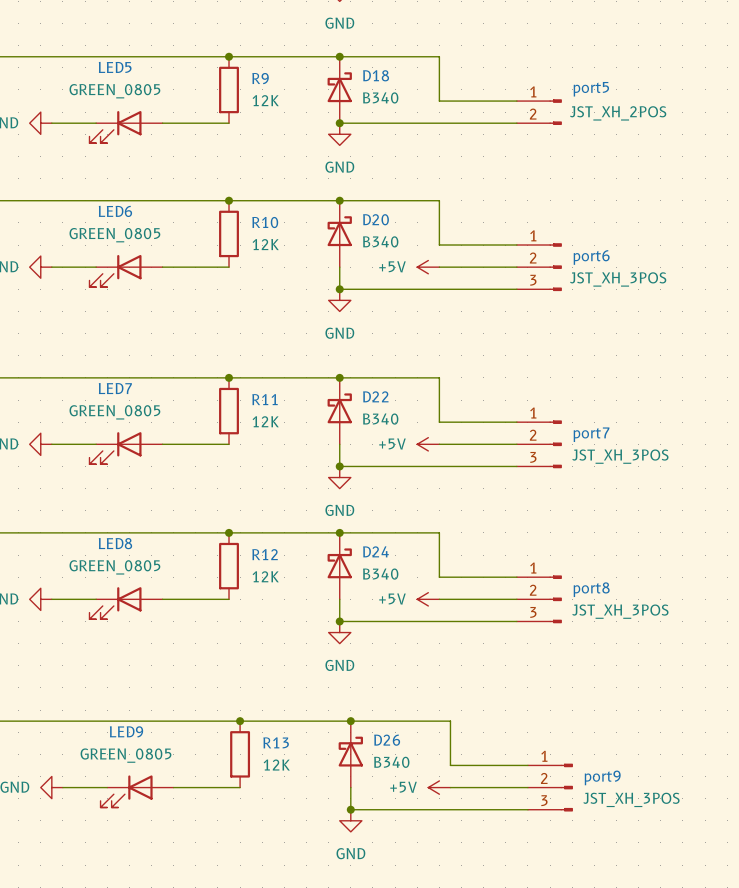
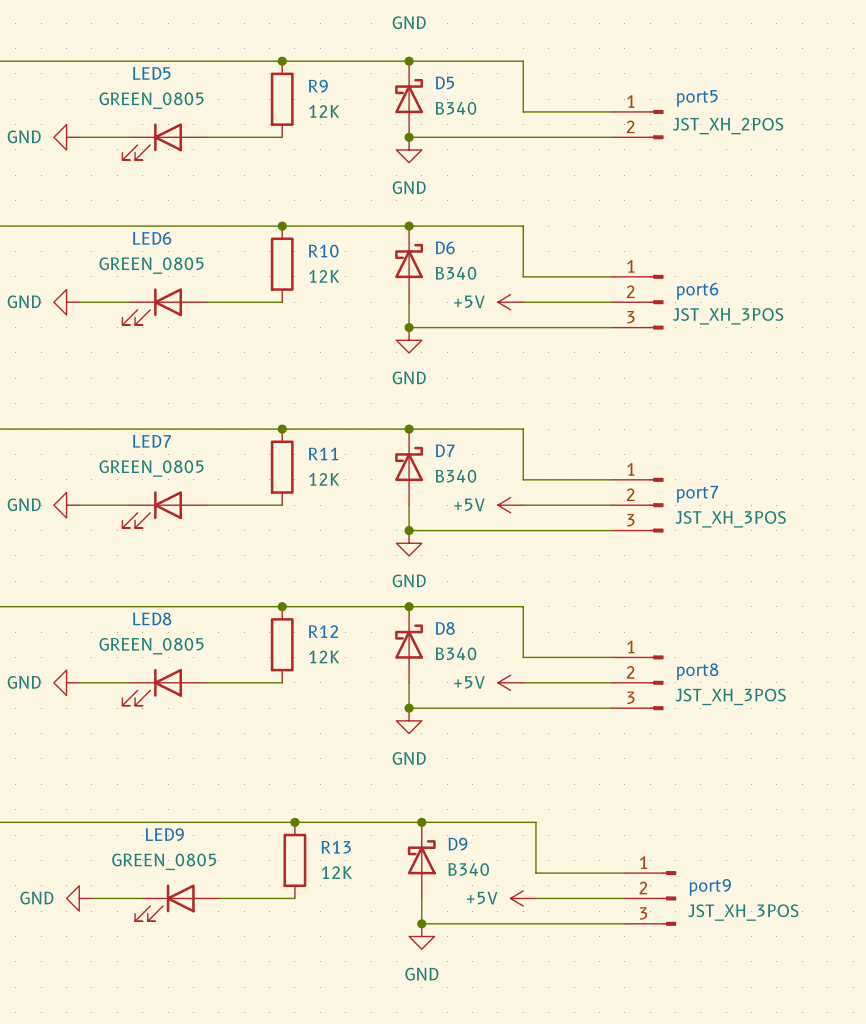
D18 name: D18 (376, 75) -> D5 (444, 82)
D20 name: D20 (376, 219) -> D6 (445, 247)
D22 name: D22 (375, 396) -> D7 (445, 450)
D24 name: D24 (375, 551) -> D8 (445, 628)
D26 name: D26 (387, 740) -> D9 (457, 844)

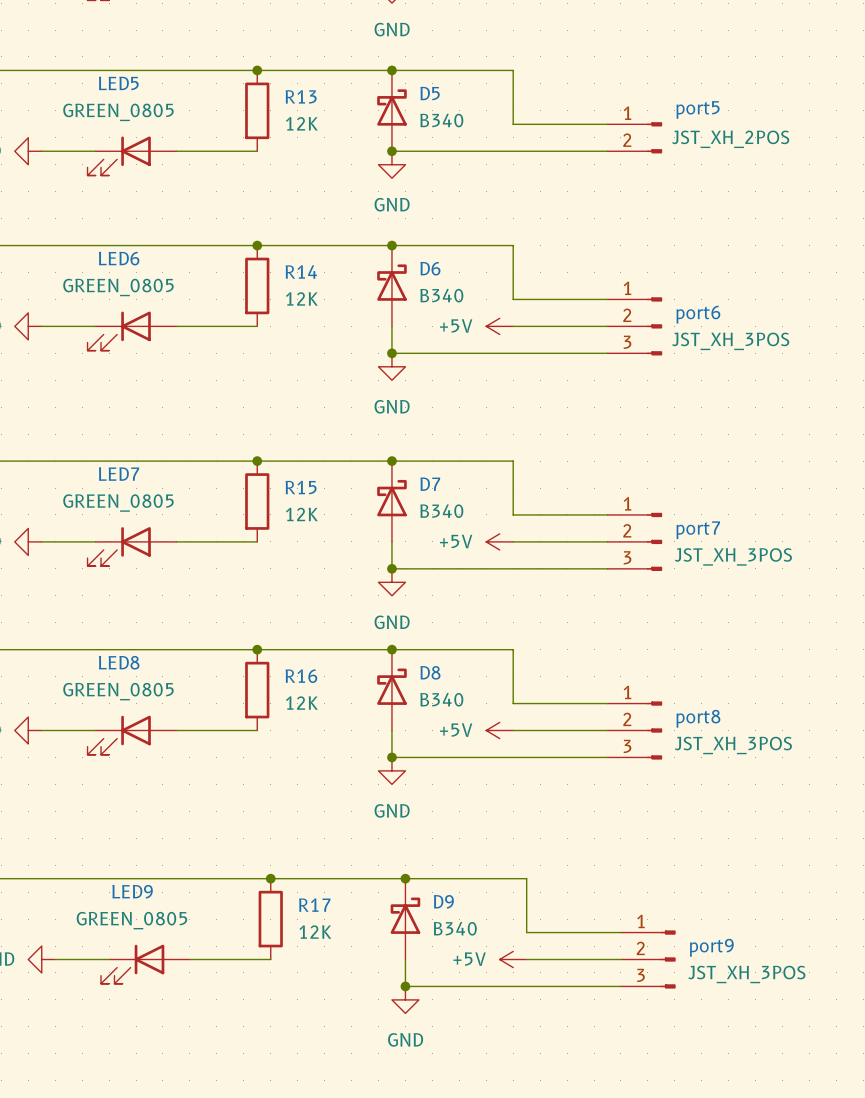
R9 name: R9 (318, 86) -> R13 (301, 96)
R10 name: R10 (323, 251) -> R14 (301, 271)
R11 name: R11 (323, 453) -> R15 (301, 487)
R12 name: R12 (323, 631) -> R16 (301, 676)
R13 name: R13 (336, 847) -> R17 (314, 905)

